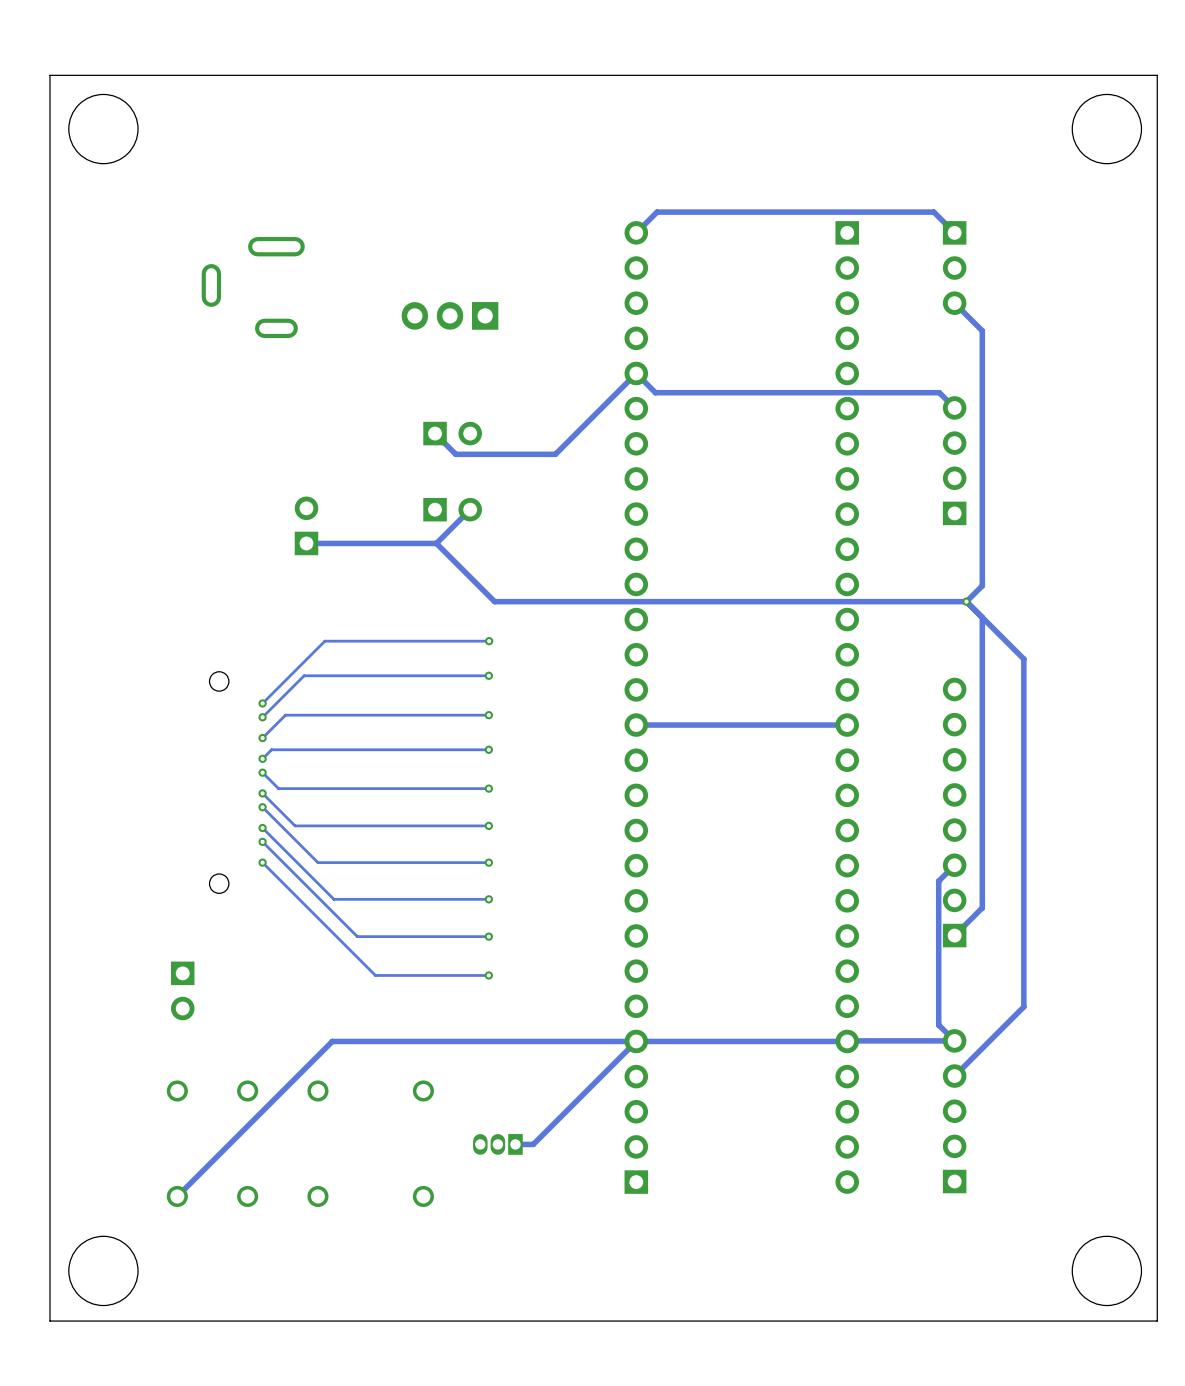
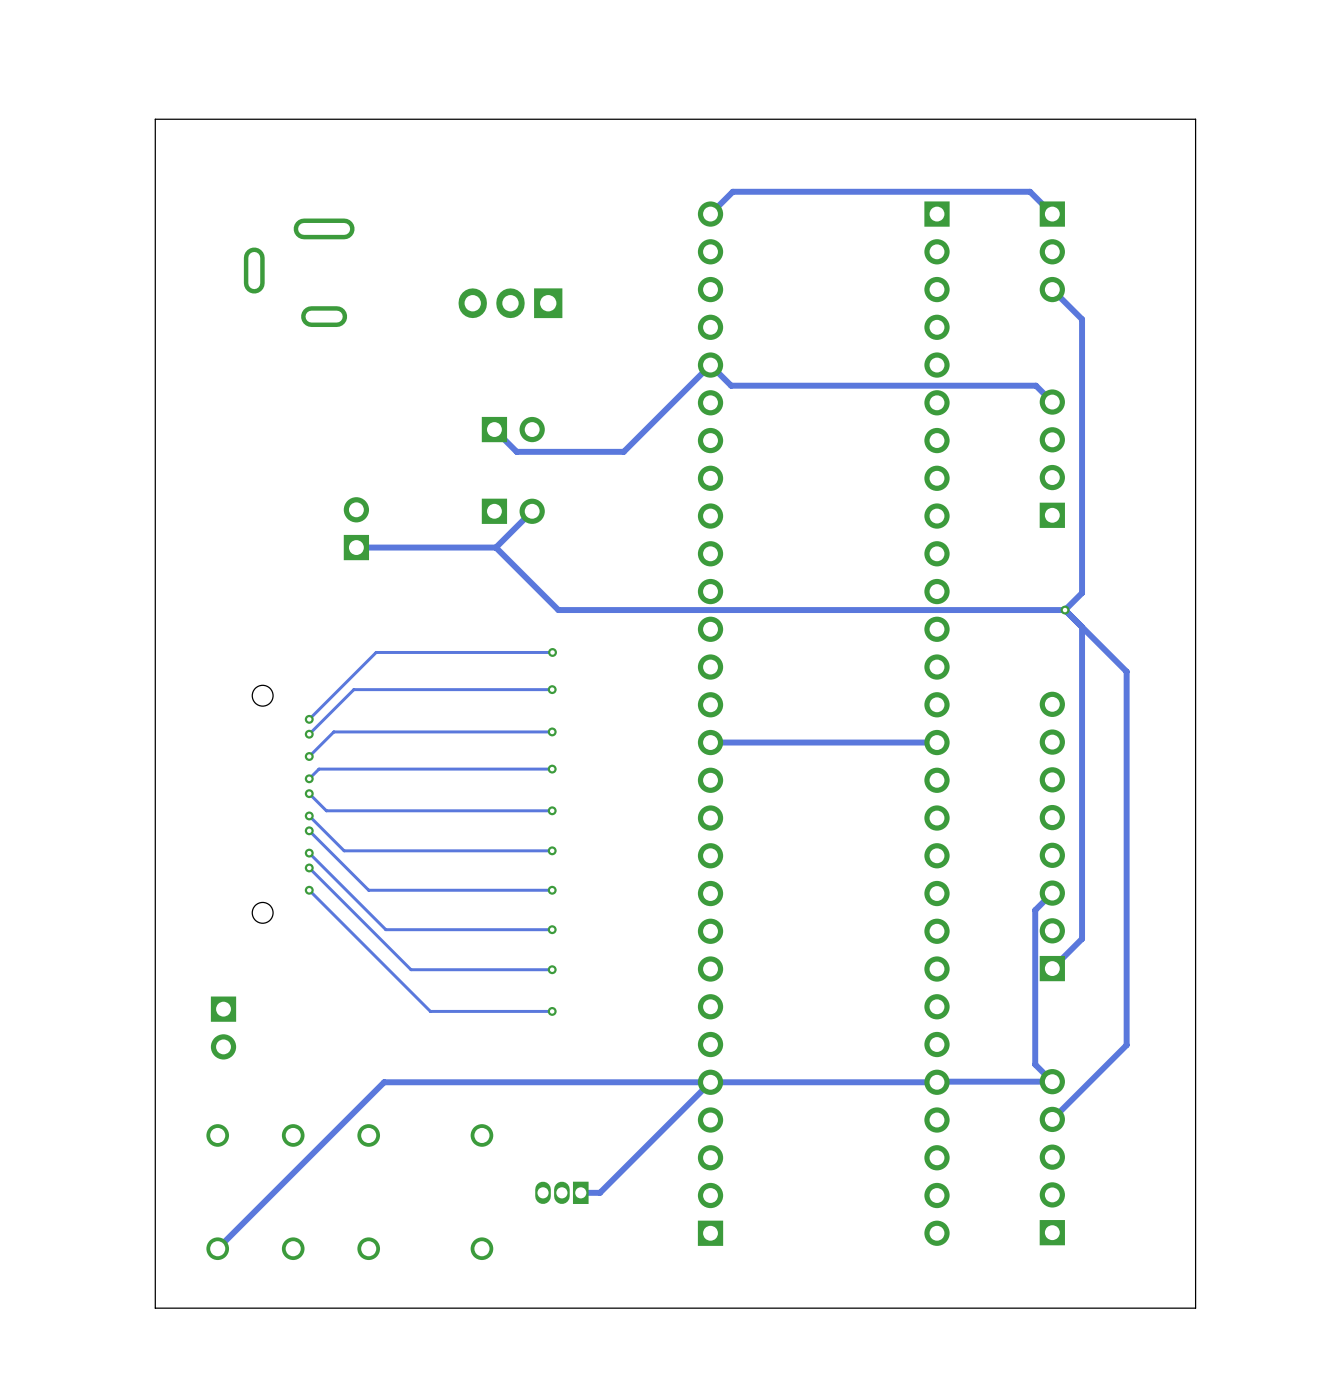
board edge: (1157, 75) (49, 75) (49, 1321) (1157, 1321) (1157, 75) -> (1195, 119) (1195, 1308) (155, 1308) (155, 119) (1195, 119)
round board edge: [68, 94, 139, 165] -> none
round board edge: [1071, 94, 1142, 165] -> none
round board edge: [68, 1235, 139, 1306] -> none
round board edge: [1071, 1235, 1142, 1306] -> none

